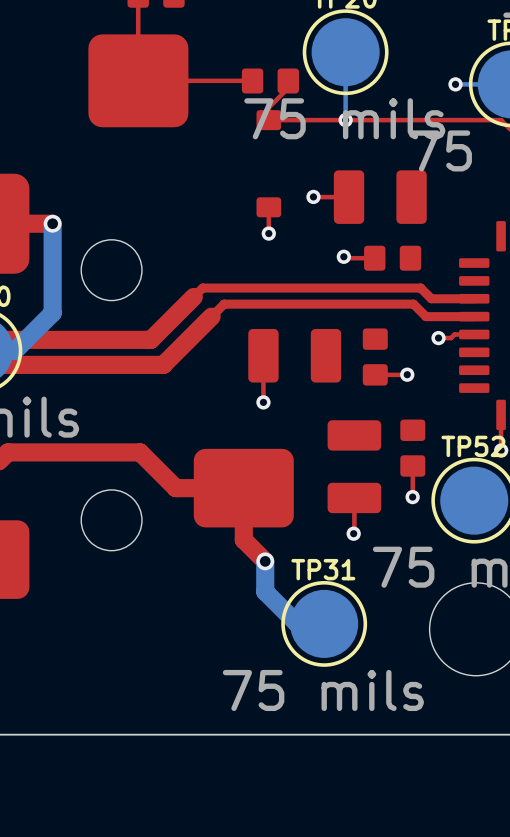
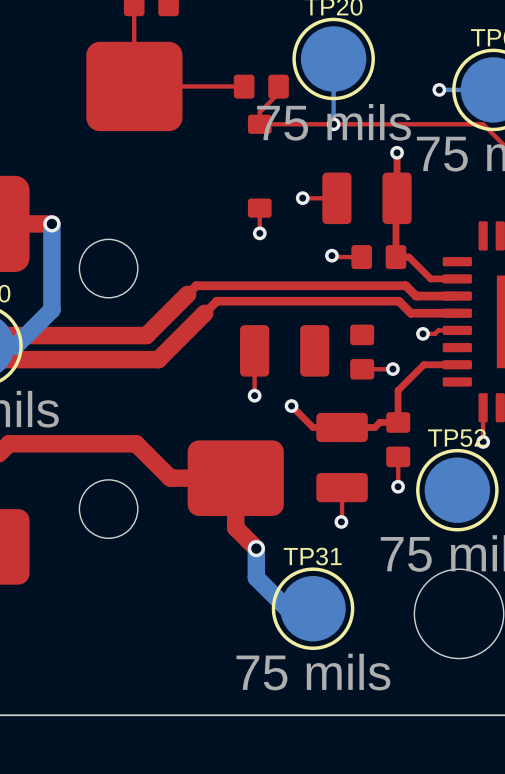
top track: none -> (397, 152) (396, 257) (408, 257) (430, 278) (457, 278)
via: none -> (397, 152)
top track: none -> (457, 364) (423, 364) (398, 390) (398, 422) (379, 422) (374, 427) (313, 427) (291, 406)
via: none -> (291, 406)

